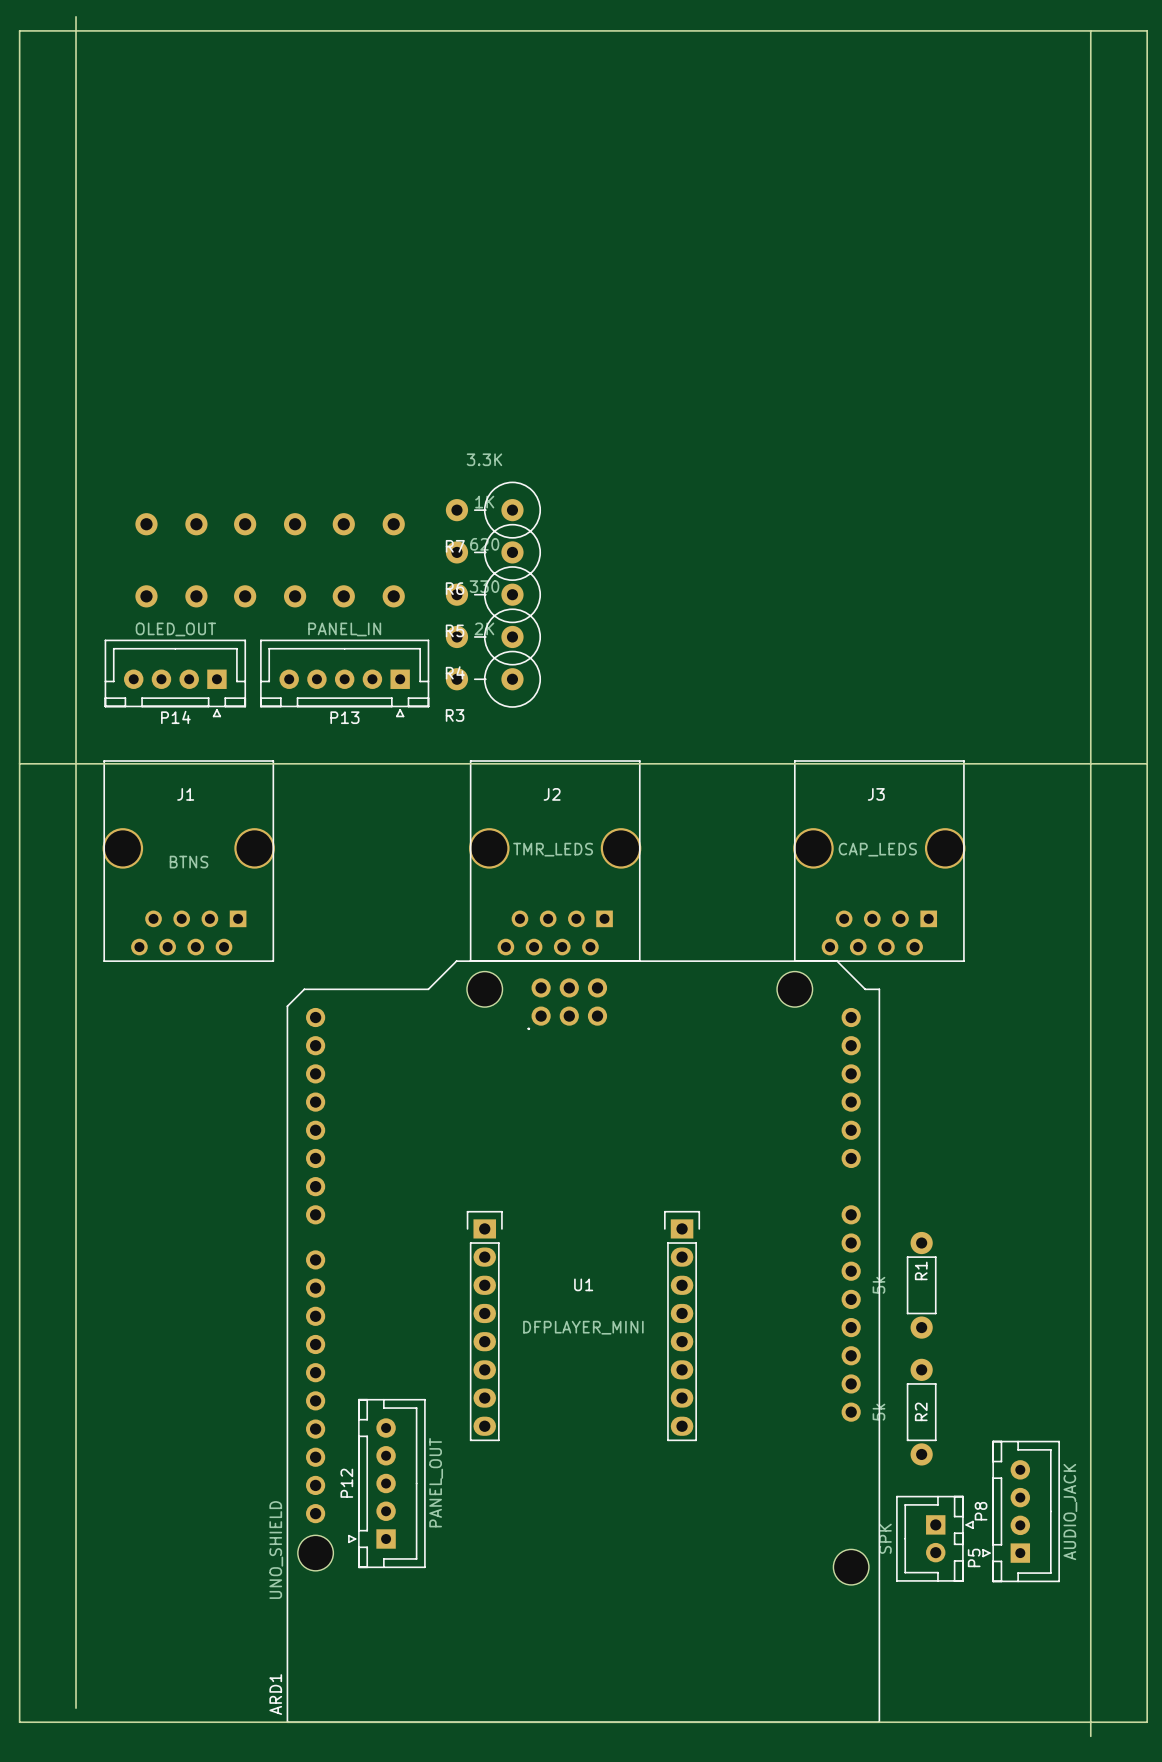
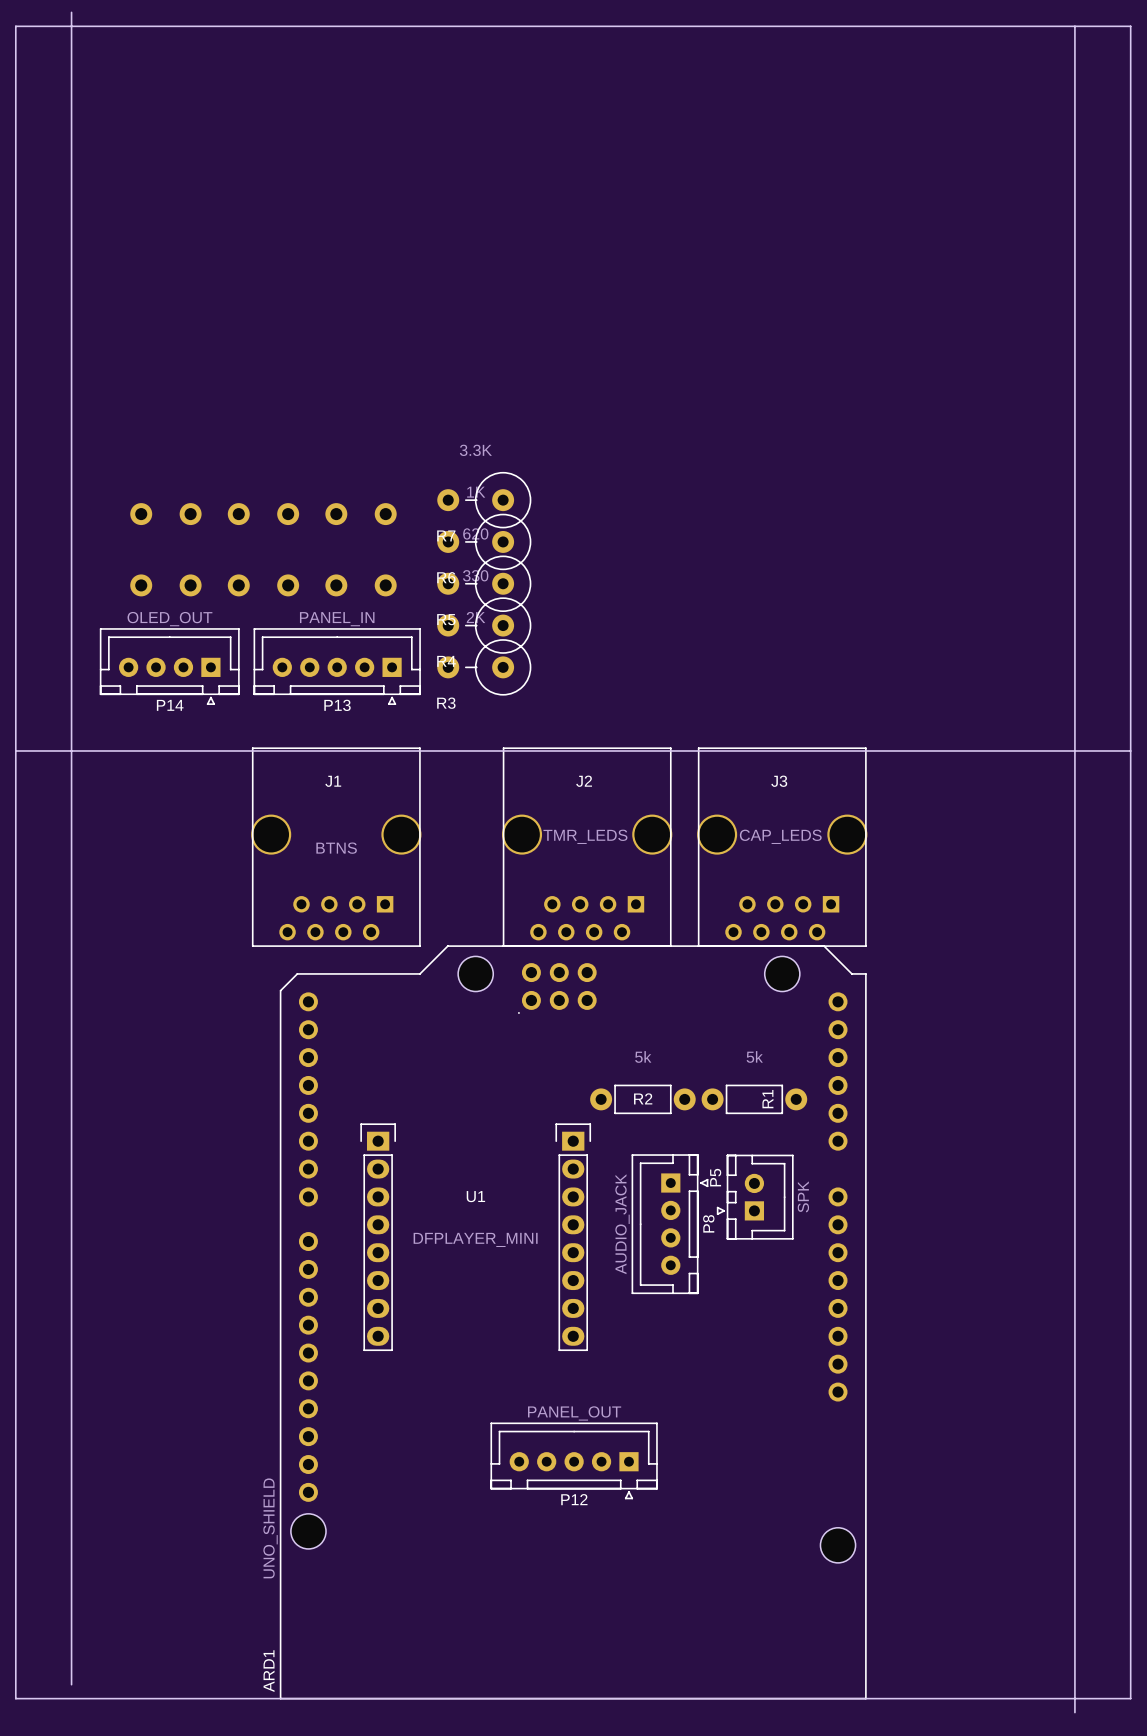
J1 position: (188, 861) -> (336, 847)
J2 position: (555, 861) -> (587, 847)
J3 position: (879, 861) -> (782, 847)
R1 rotation: 0° (921, 1285) -> 90° clockwise (754, 1099)
R1 position: (921, 1285) -> (754, 1099)
U1 position: (583, 1326) -> (475, 1237)
R2 rotation: 0° (921, 1412) -> 90° clockwise (642, 1099)
R2 position: (921, 1412) -> (642, 1099)
P12 rotation: 0° (386, 1483) -> 90° counterclockwise (574, 1460)
P12 position: (386, 1483) -> (574, 1460)
P8 rotation: 0° (1021, 1511) -> 180° (669, 1224)
P8 position: (1021, 1511) -> (669, 1224)
P5 rotation: 0° (934, 1538) -> 180° (755, 1197)
P5 position: (934, 1538) -> (755, 1197)

